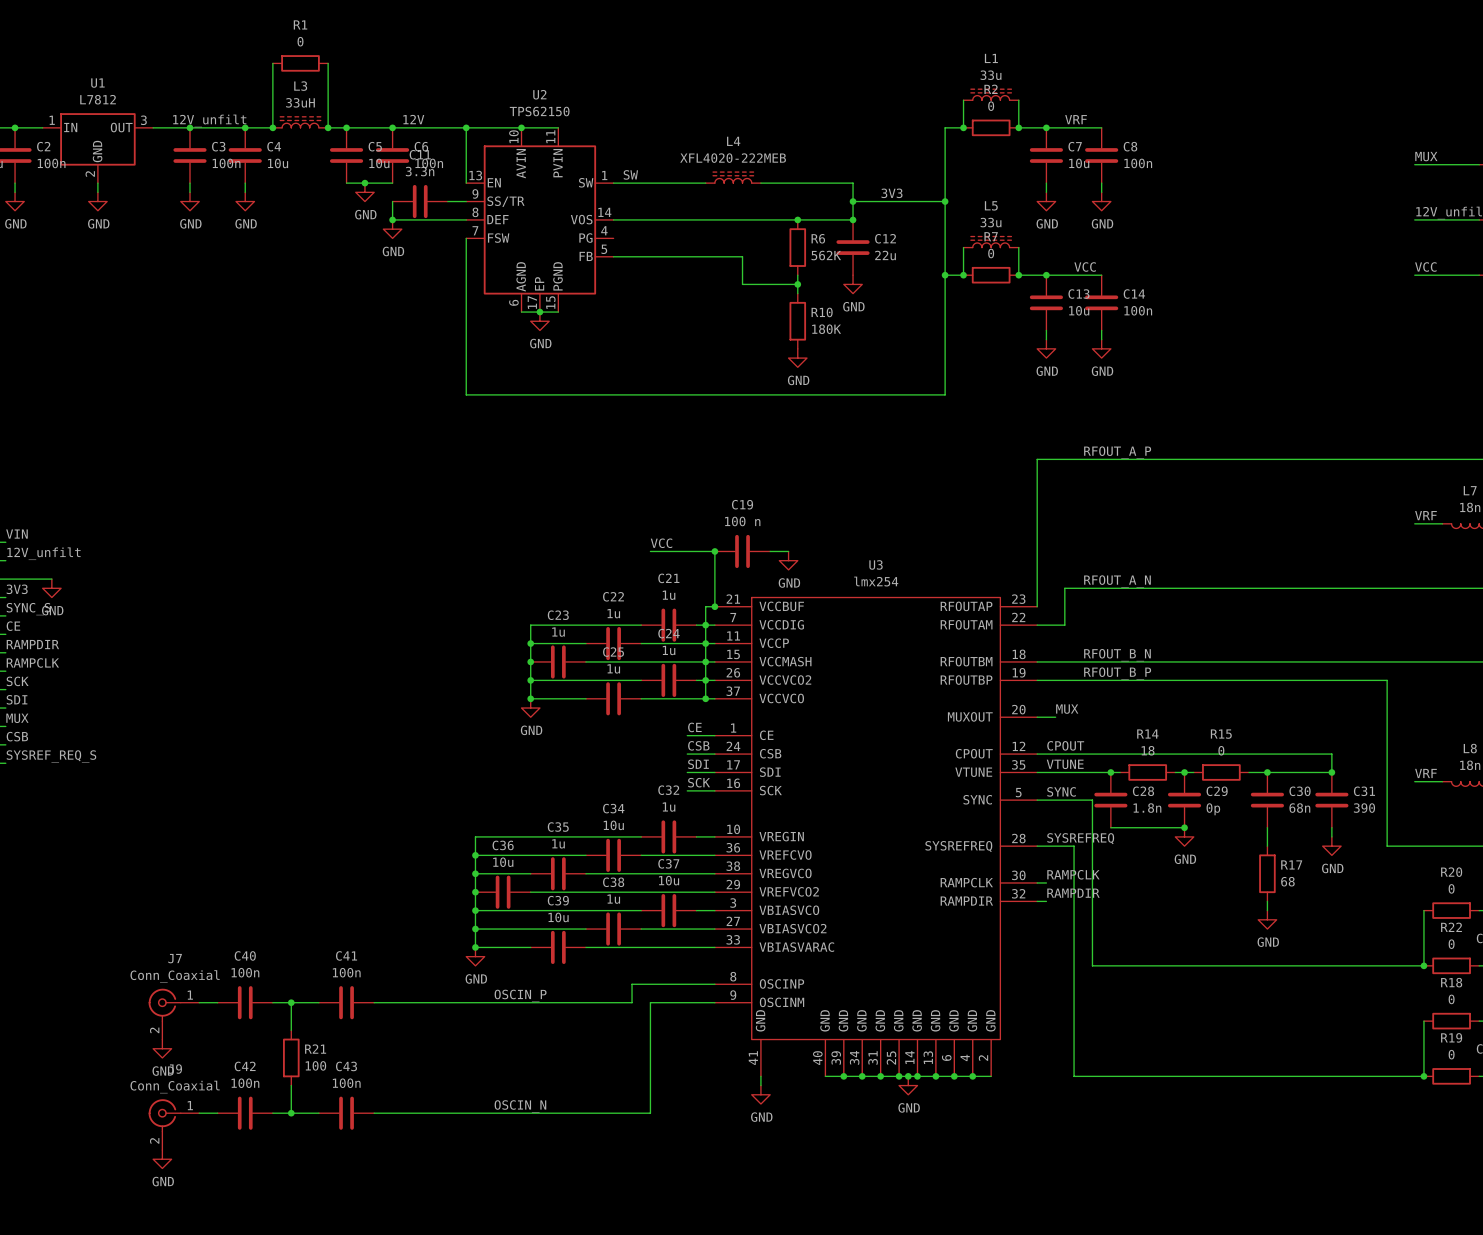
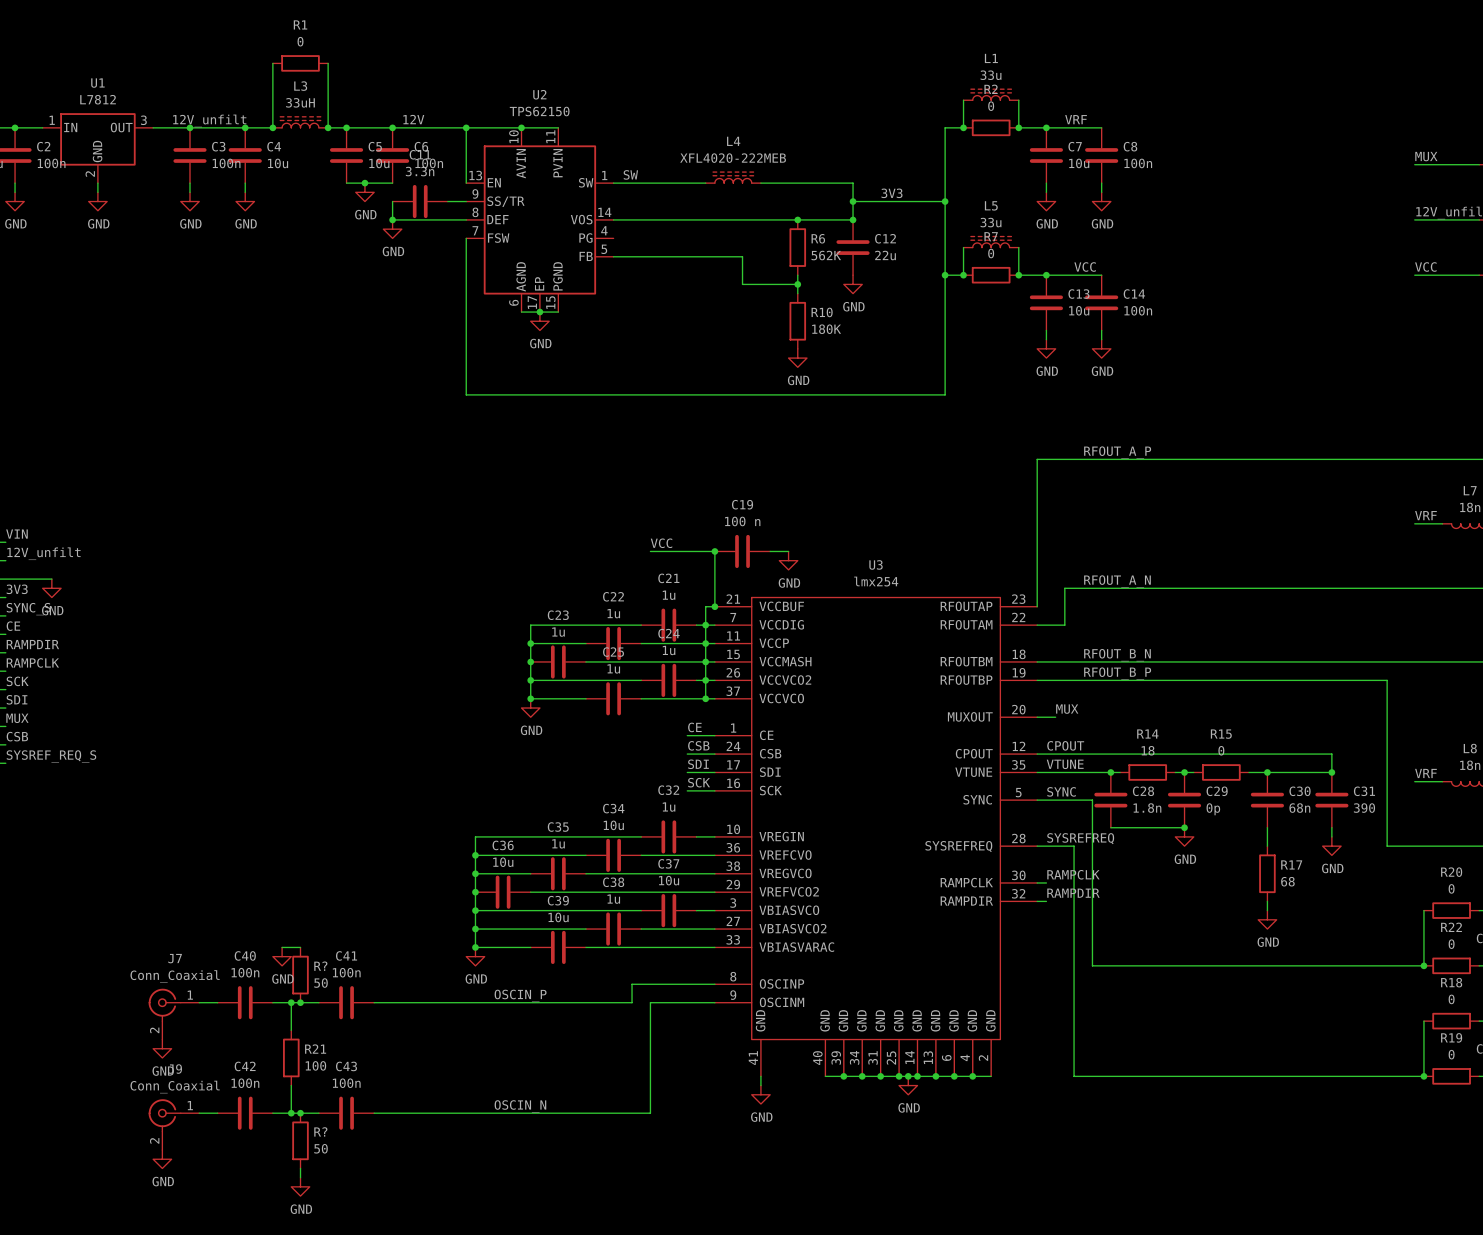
wire: none -> (282, 947) (300, 947)
power symbol: none -> GND (282, 956)
R?: none -> 50 (300, 975)
junction: none -> (300, 1002)
junction: none -> (300, 1113)
R?: none -> 50 (300, 1140)
wire: none -> (300, 1168) (300, 1177)
power symbol: none -> GND (300, 1186)

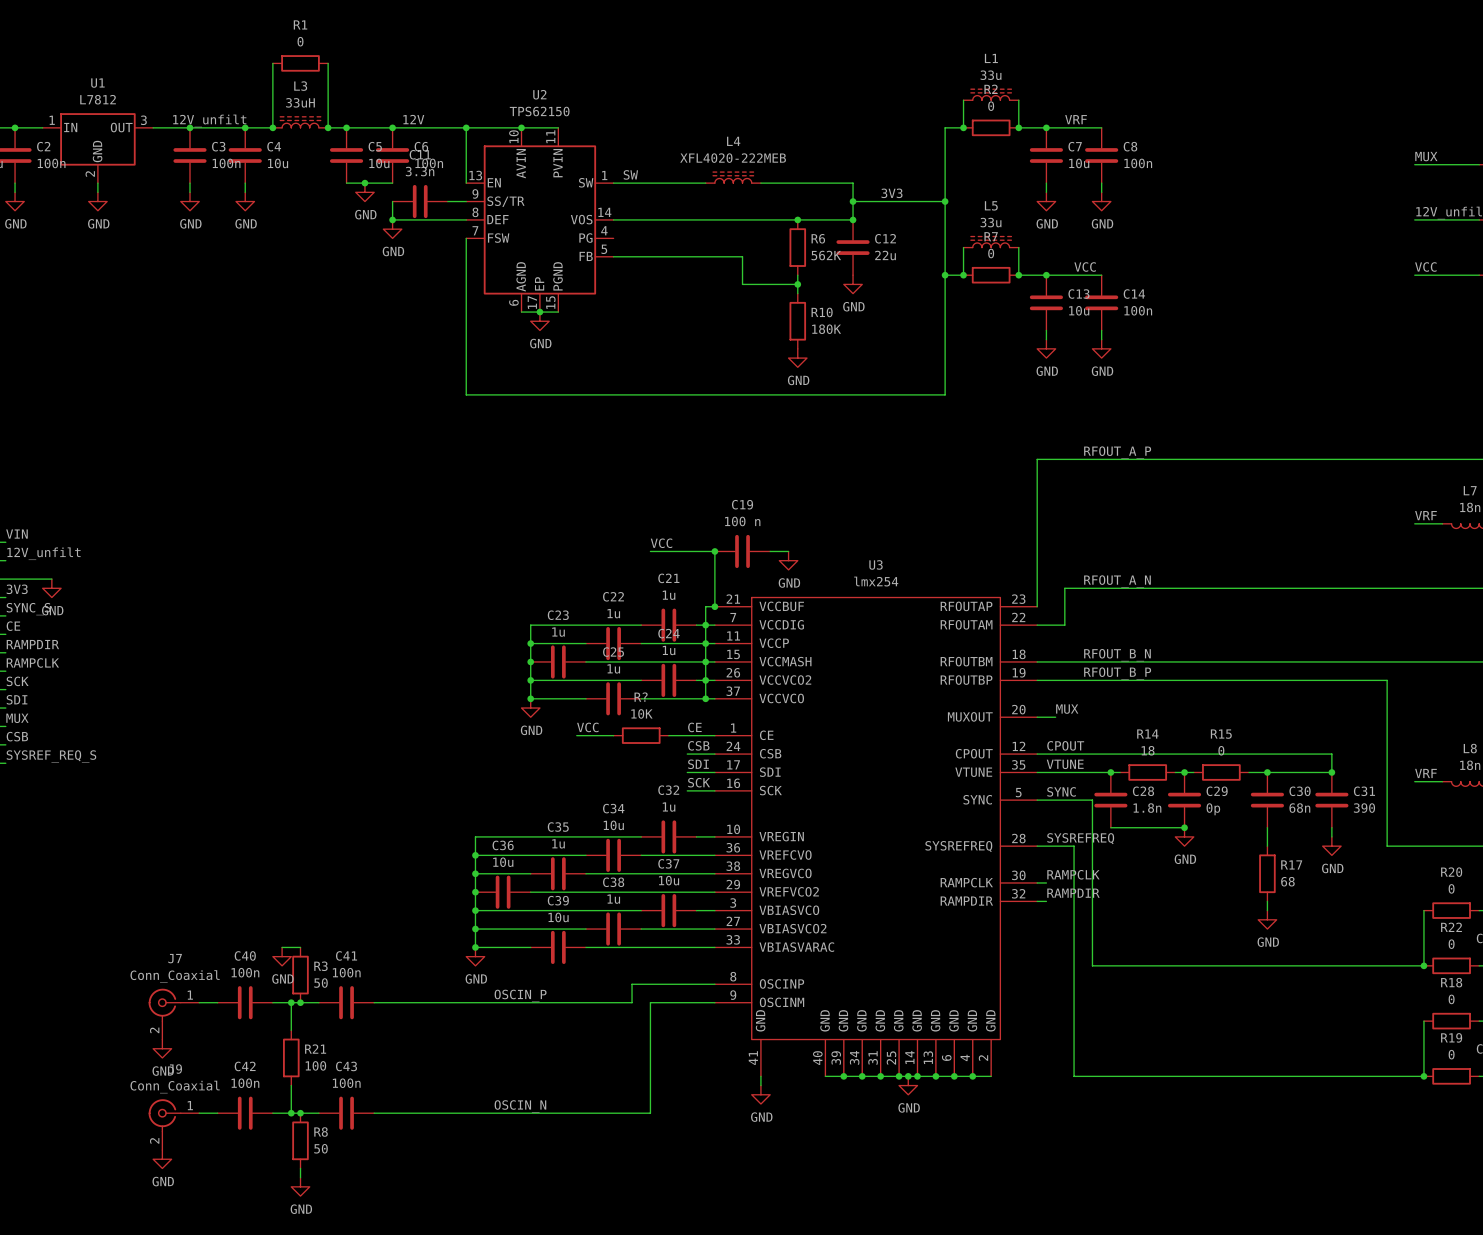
label: none -> VCC (587, 727)
wire: none -> (576, 735) (613, 735)
R?: none -> 10K (641, 735)
wire: none -> (668, 735) (687, 735)
R? name: R? (320, 966) -> R3 (320, 966)
R? name: R? (320, 1131) -> R8 (321, 1132)

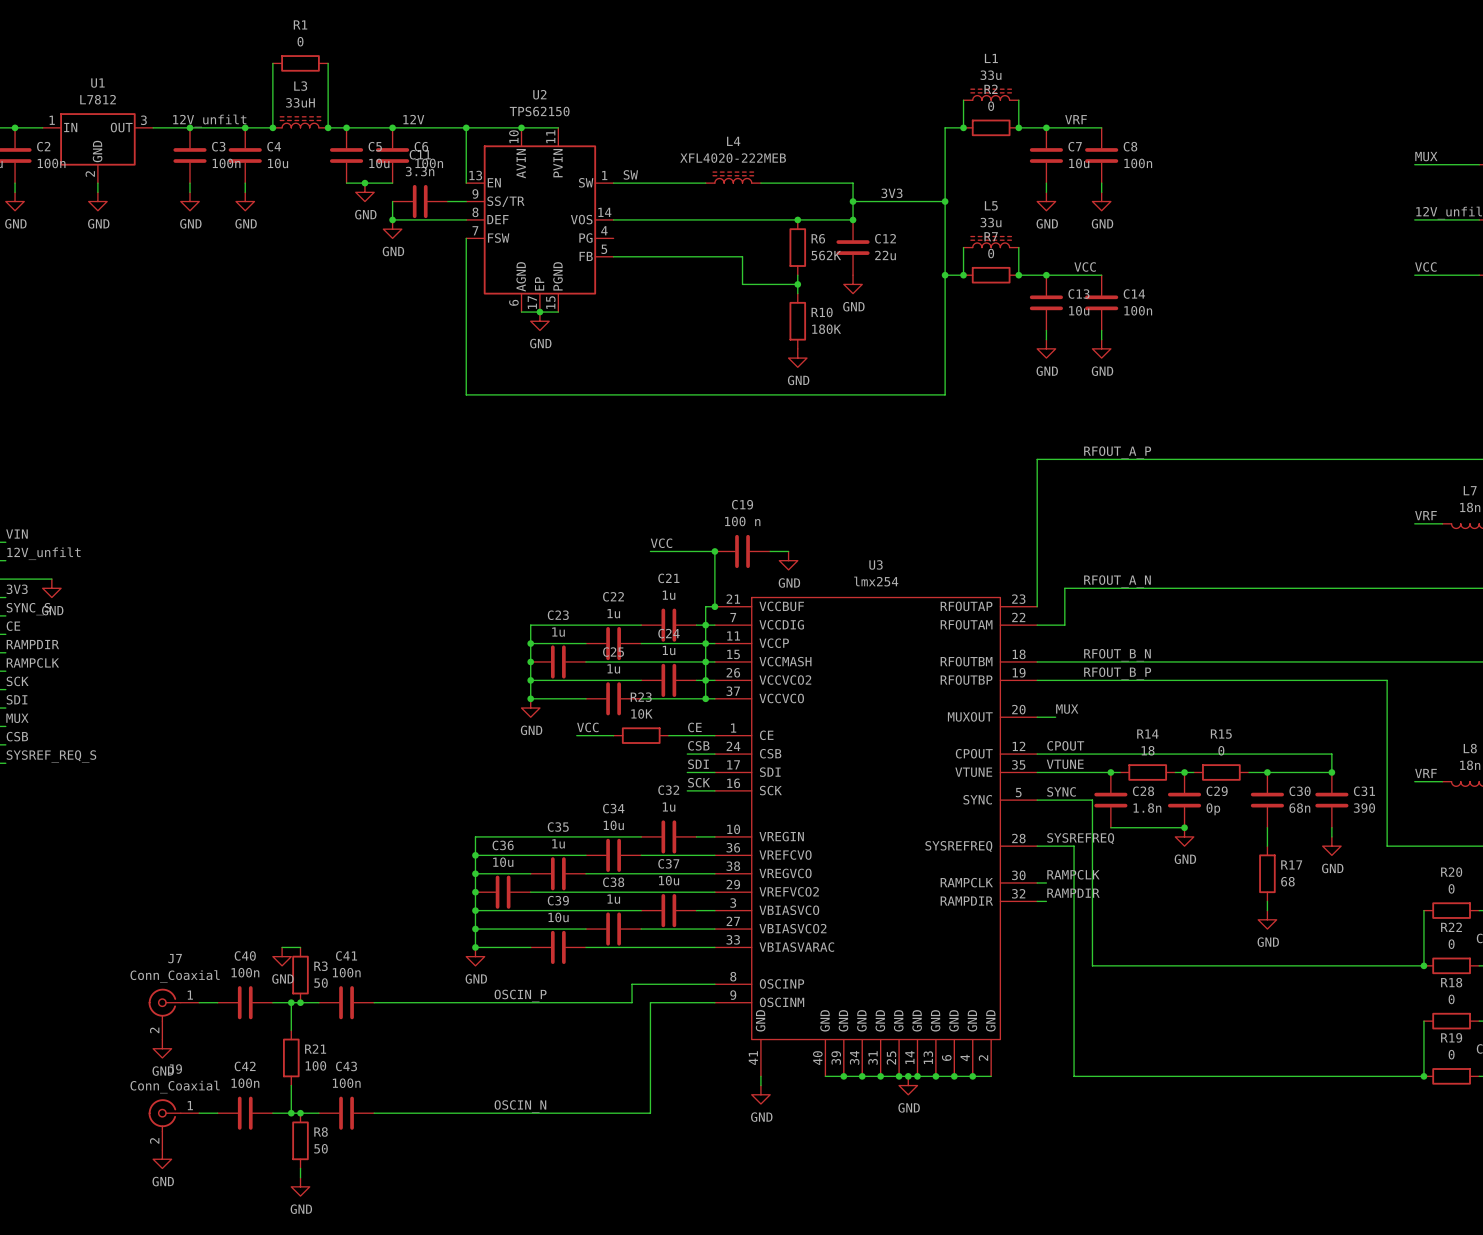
R? name: R? (641, 697) -> R23 (641, 697)

